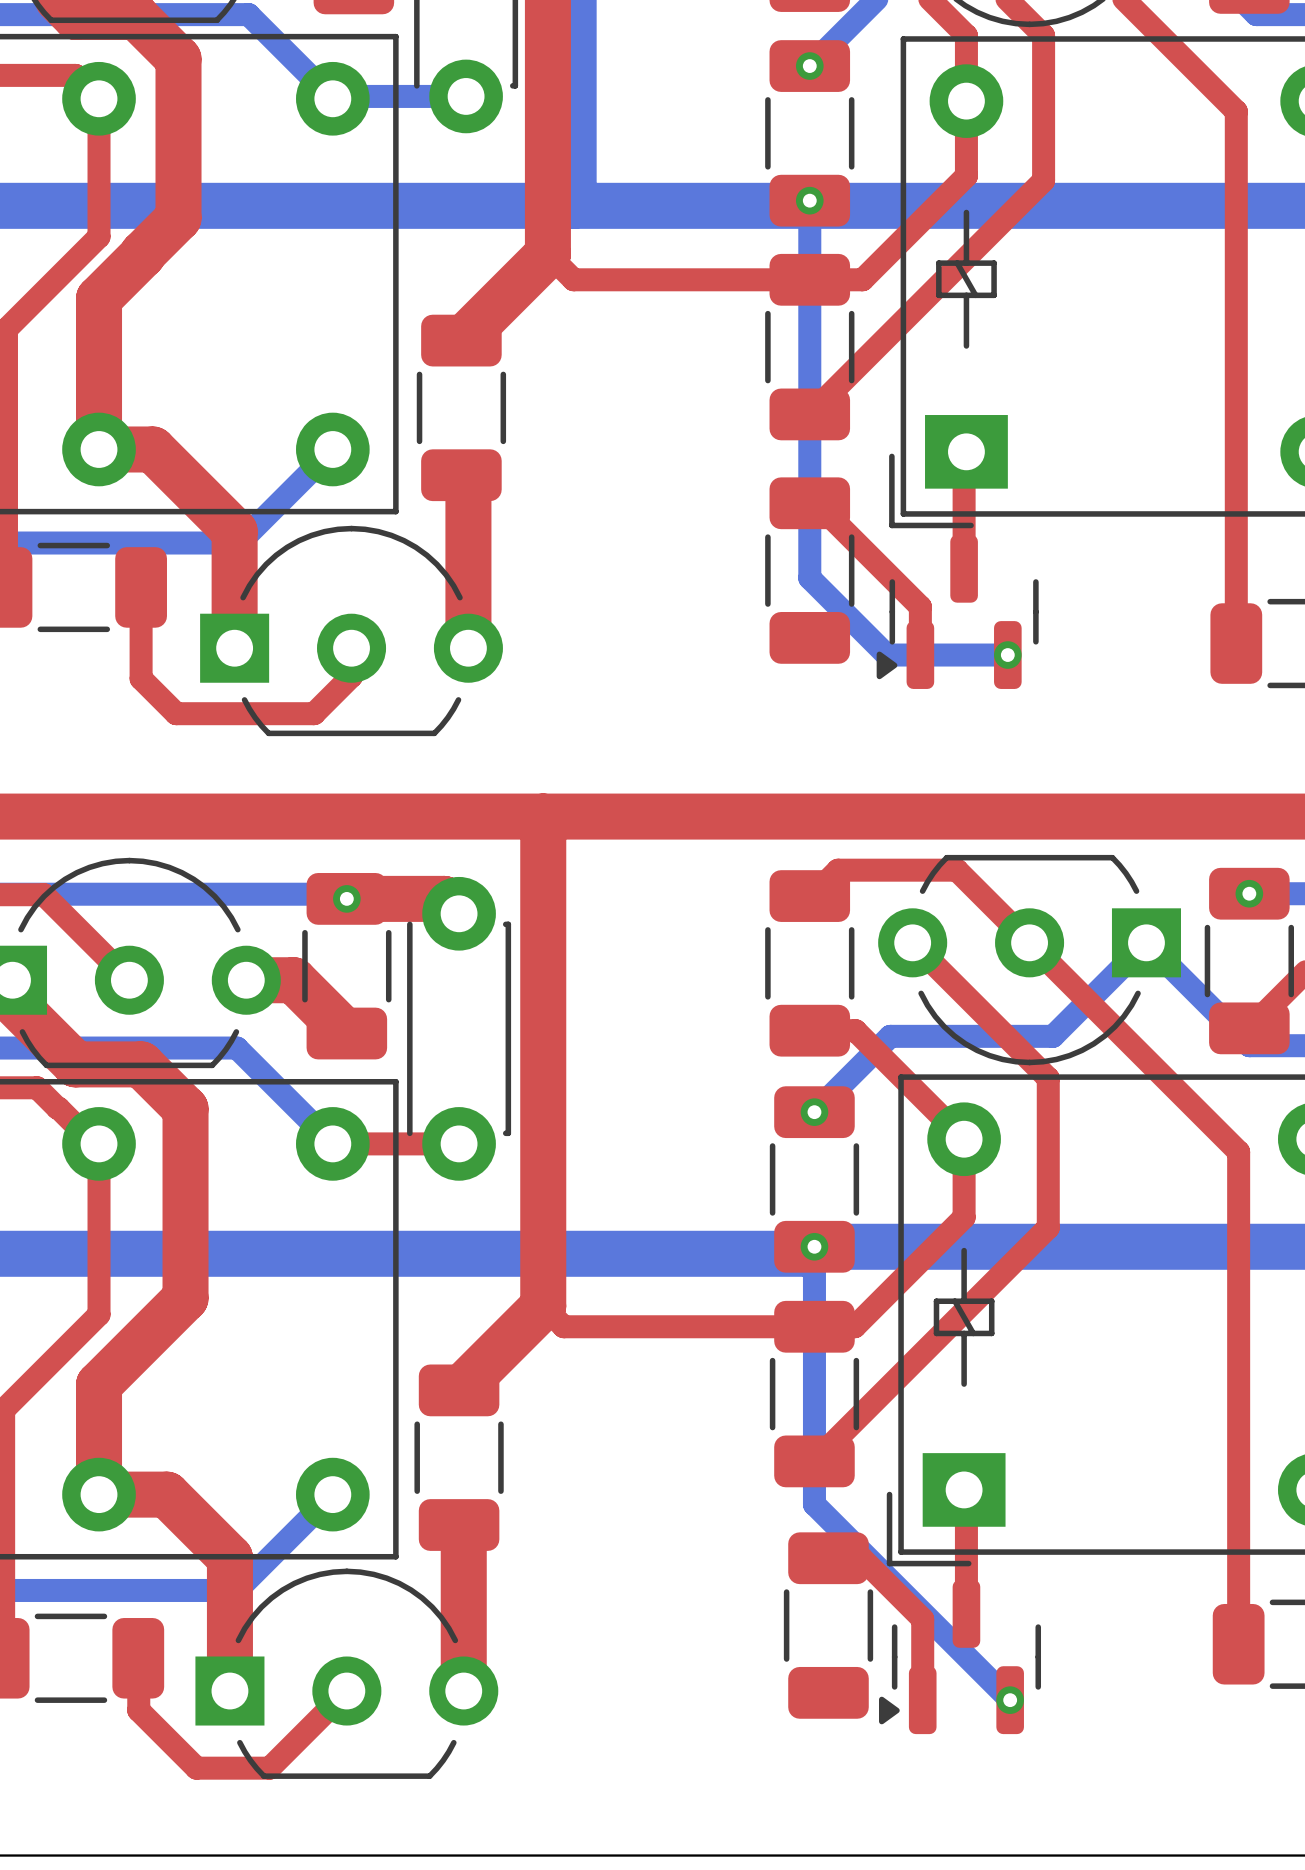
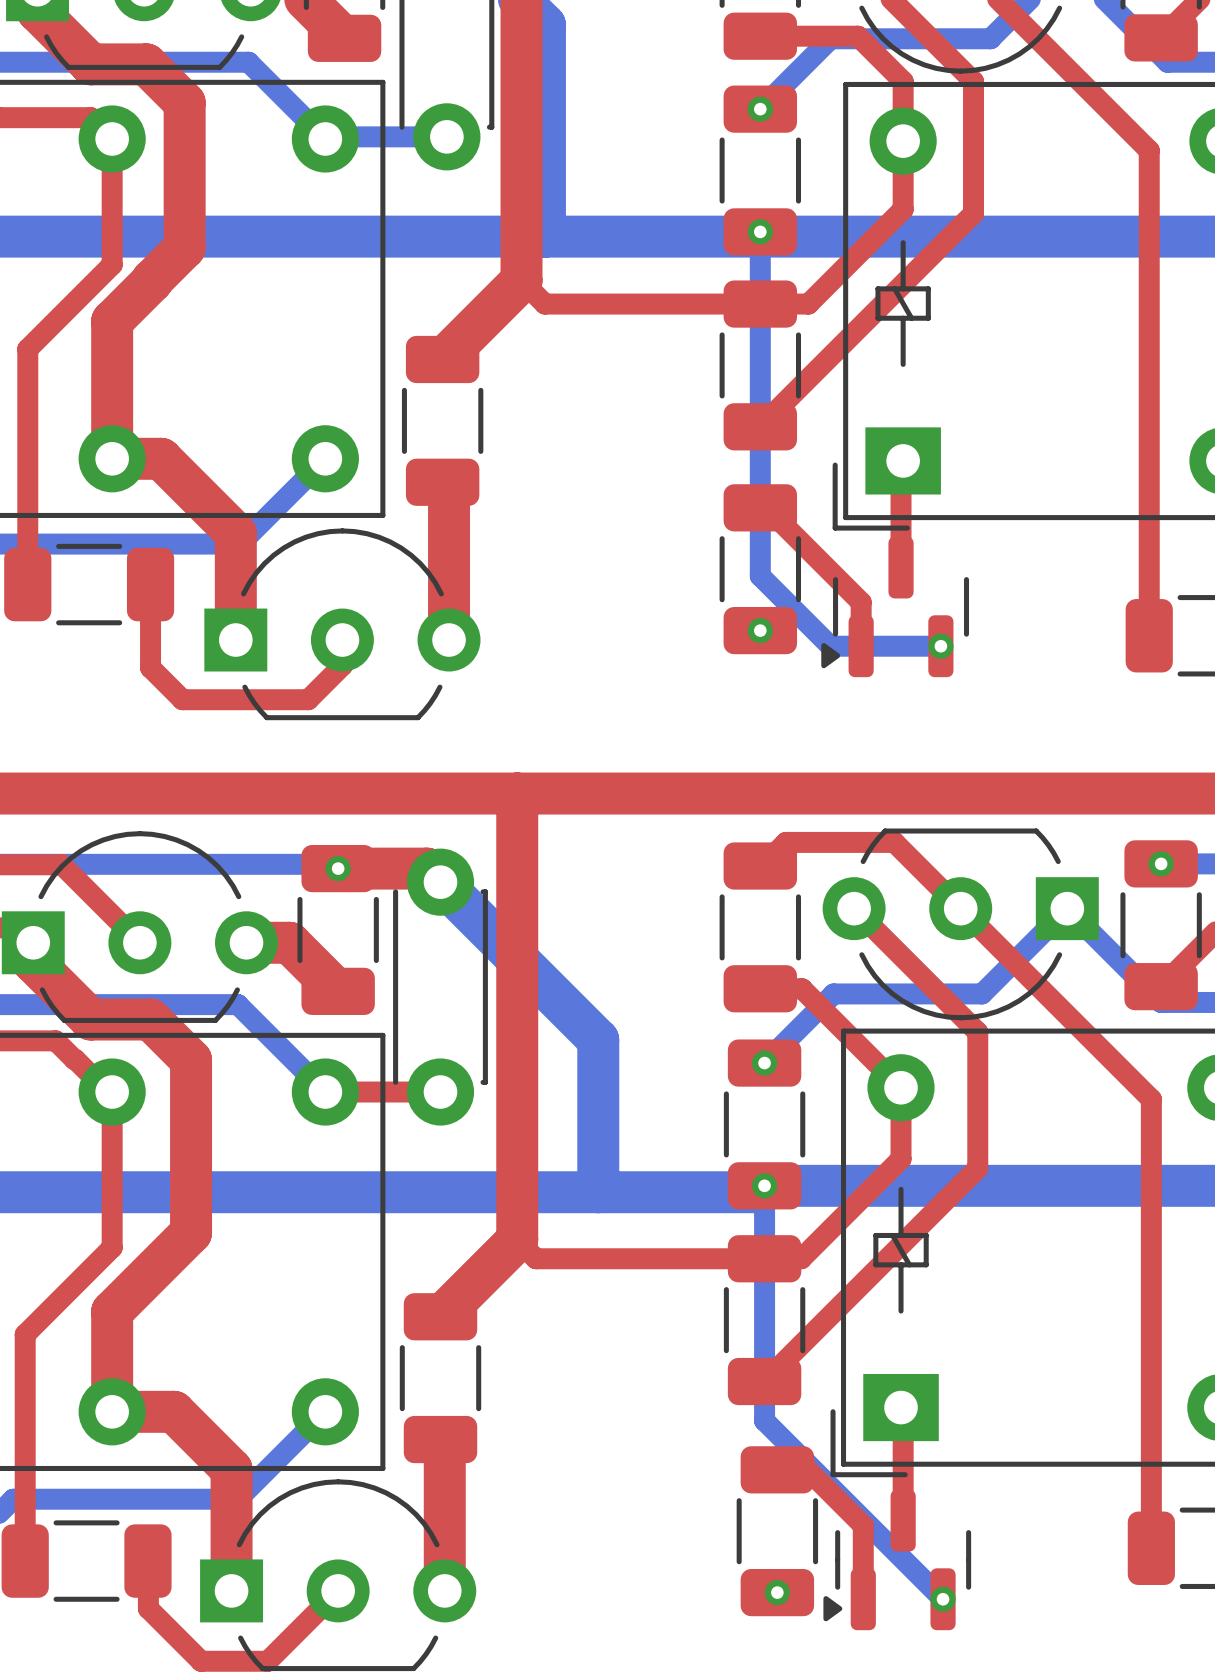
via: none -> (760, 630)
bottom track: none -> (440, 882) (598, 1039) (598, 1192)
via: none -> (777, 1592)

